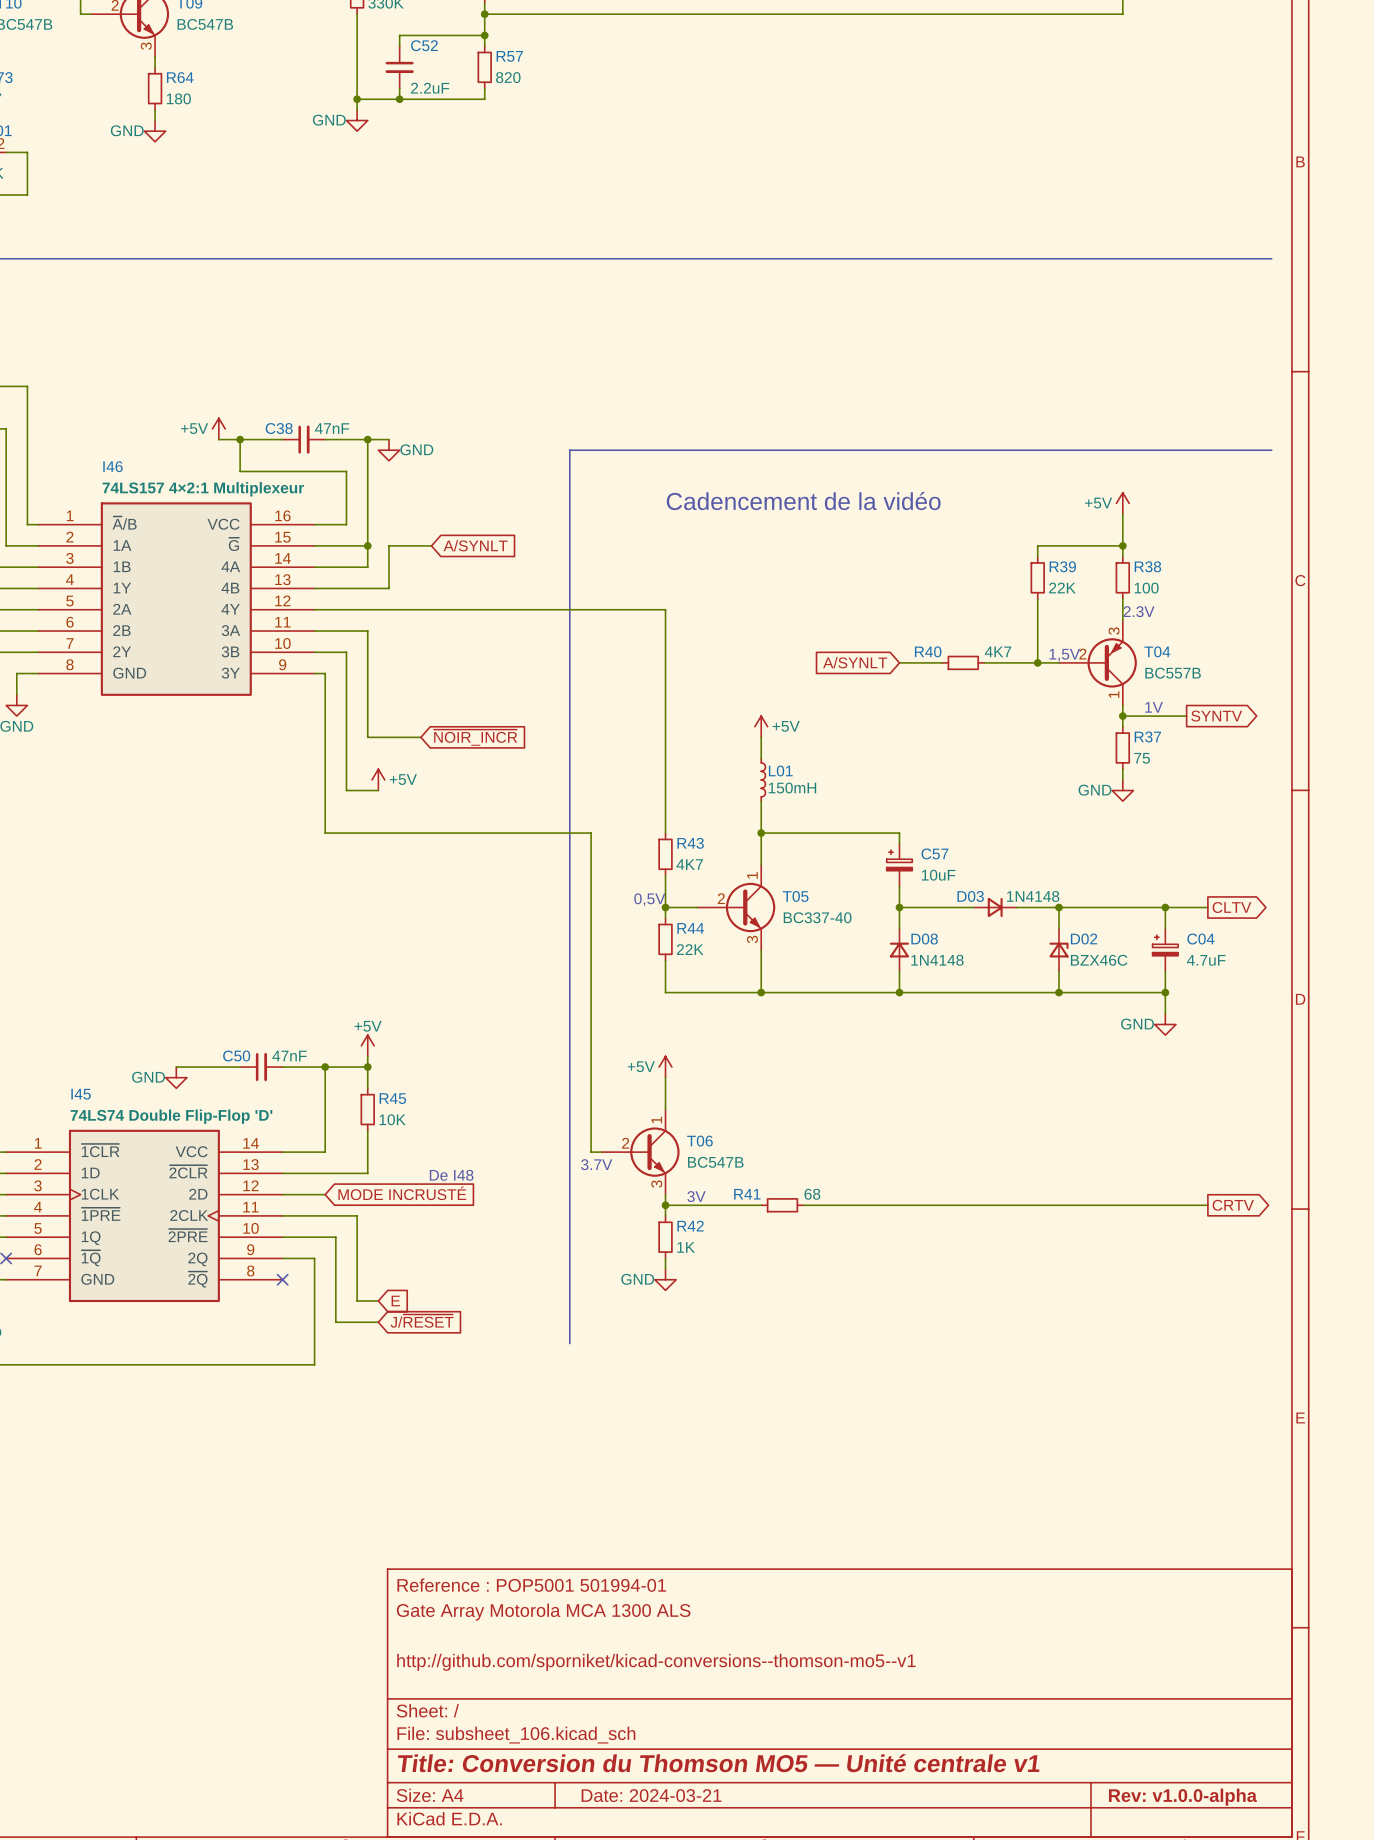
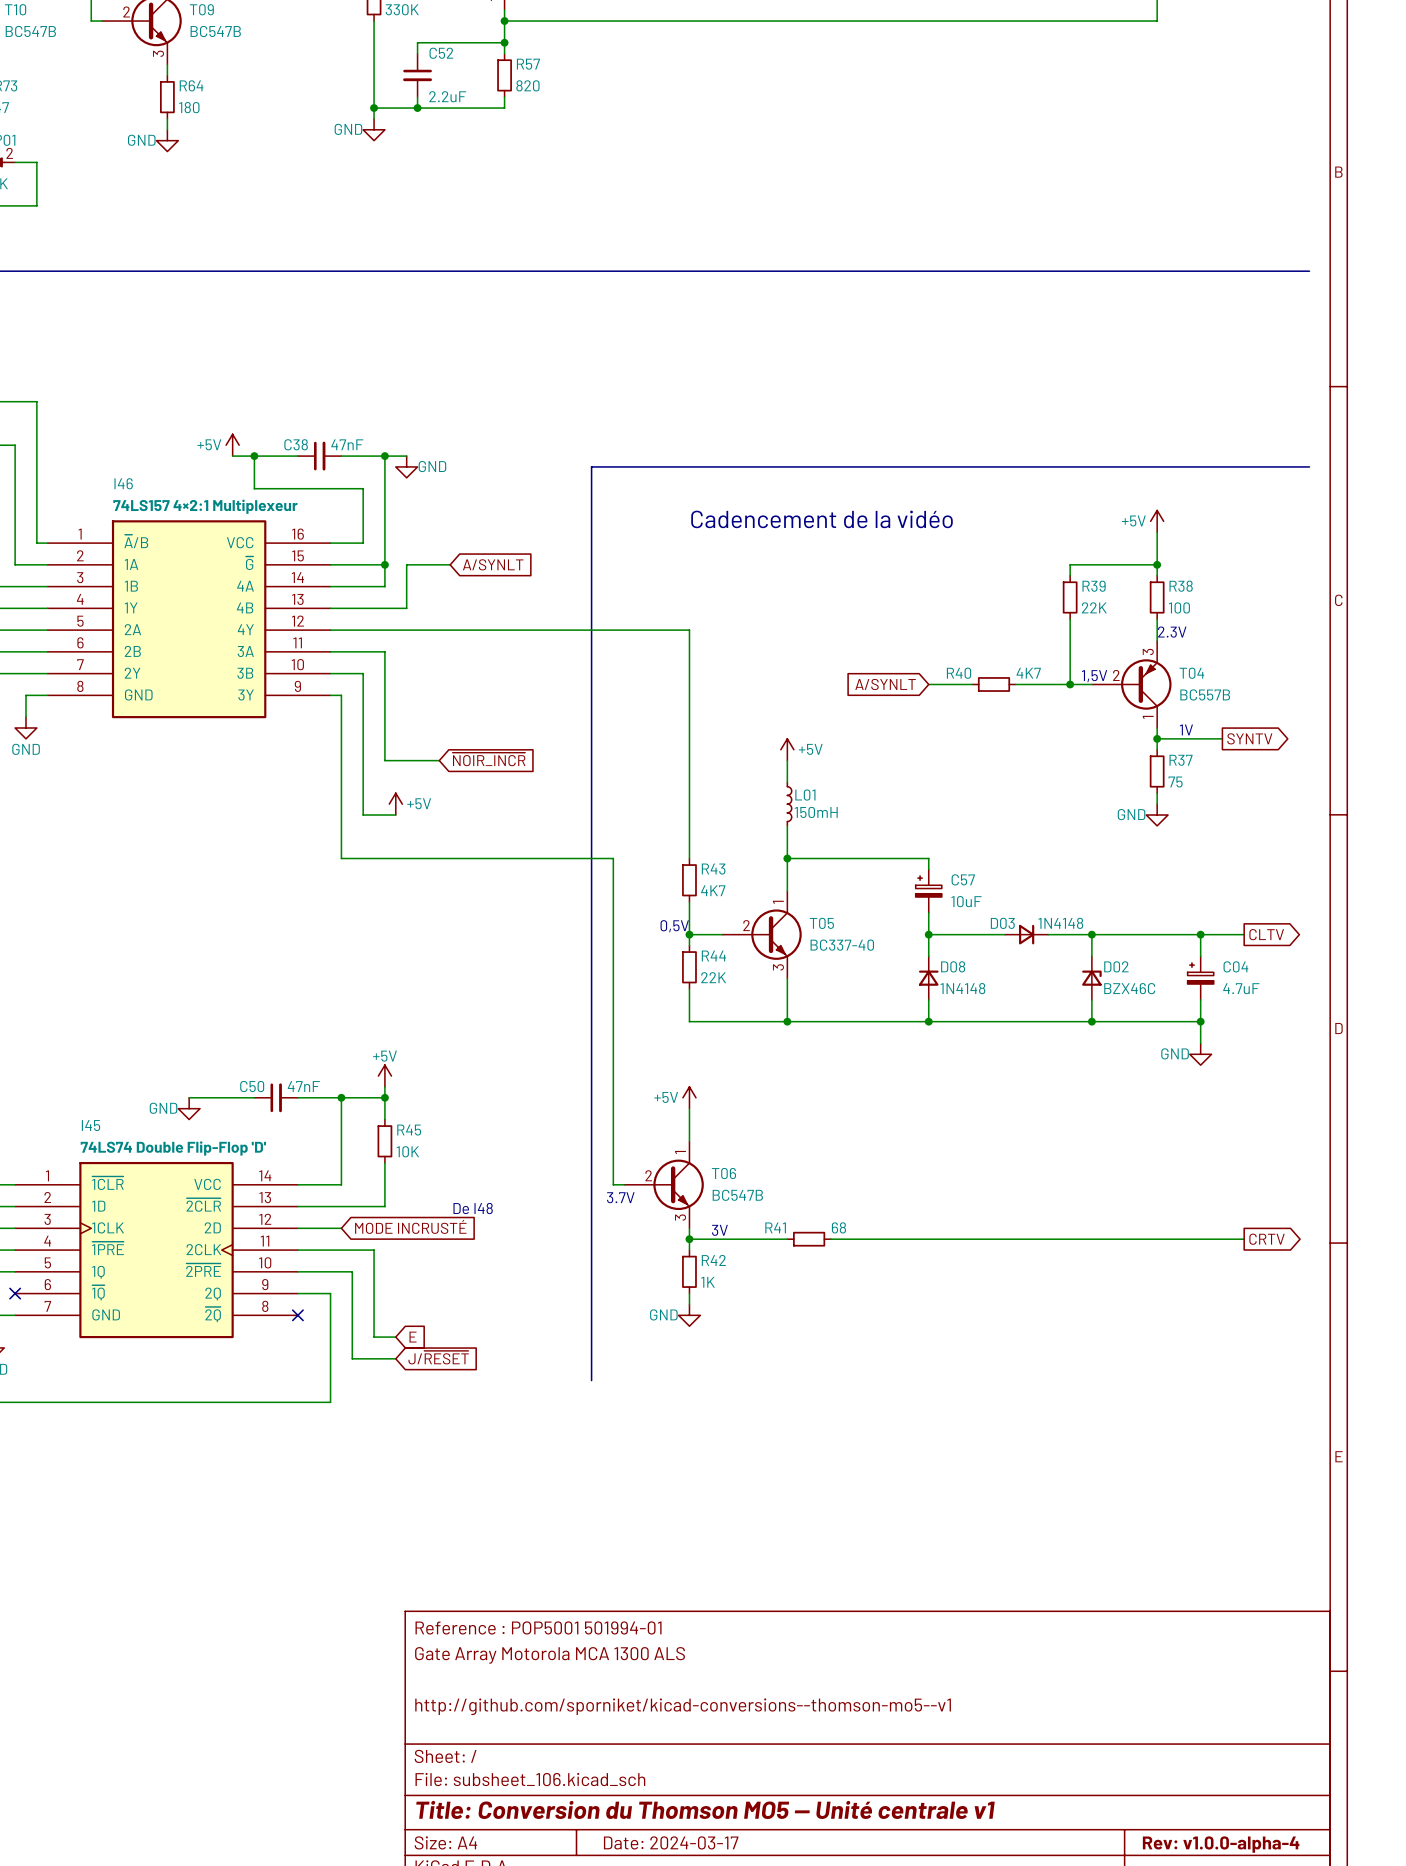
title block: Date: 2024-03-21 (651, 1795) -> Date: 2024-03-17 (671, 1842)
title block: Rev: v1.0.0-alpha (1182, 1797) -> Rev: v1.0.0-alpha-4 (1221, 1844)

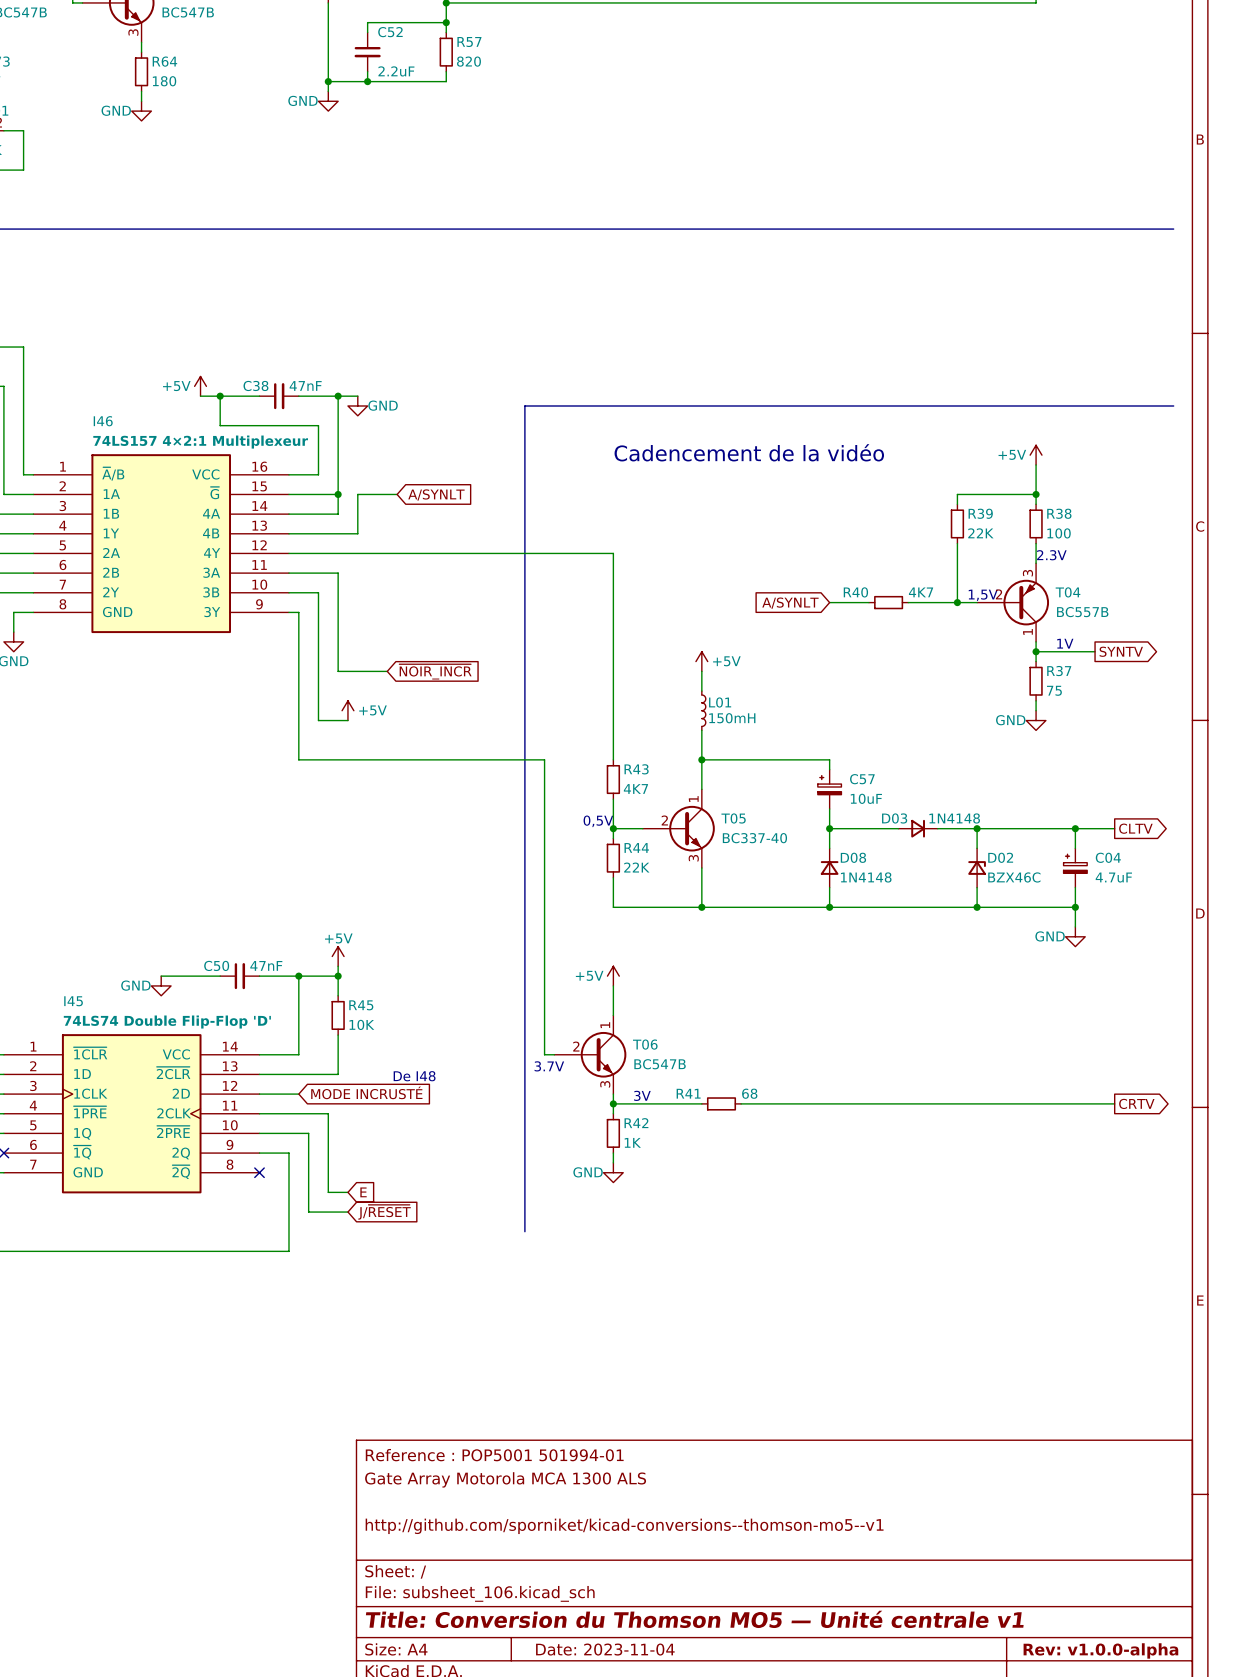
title block: Date: 2024-03-17 (671, 1842) -> Date: 2023-11-04 (605, 1649)
title block: Rev: v1.0.0-alpha-4 (1221, 1844) -> Rev: v1.0.0-alpha (1100, 1650)

